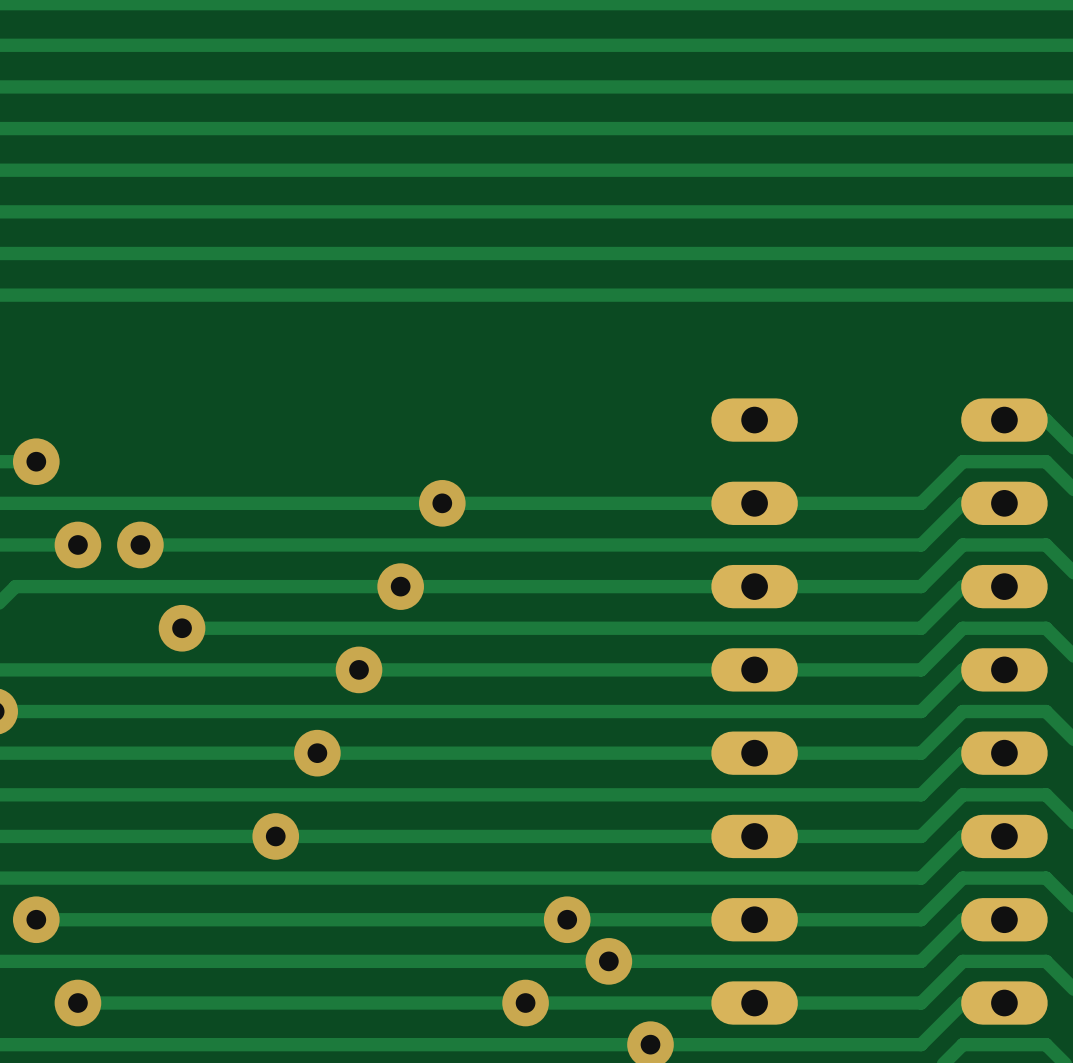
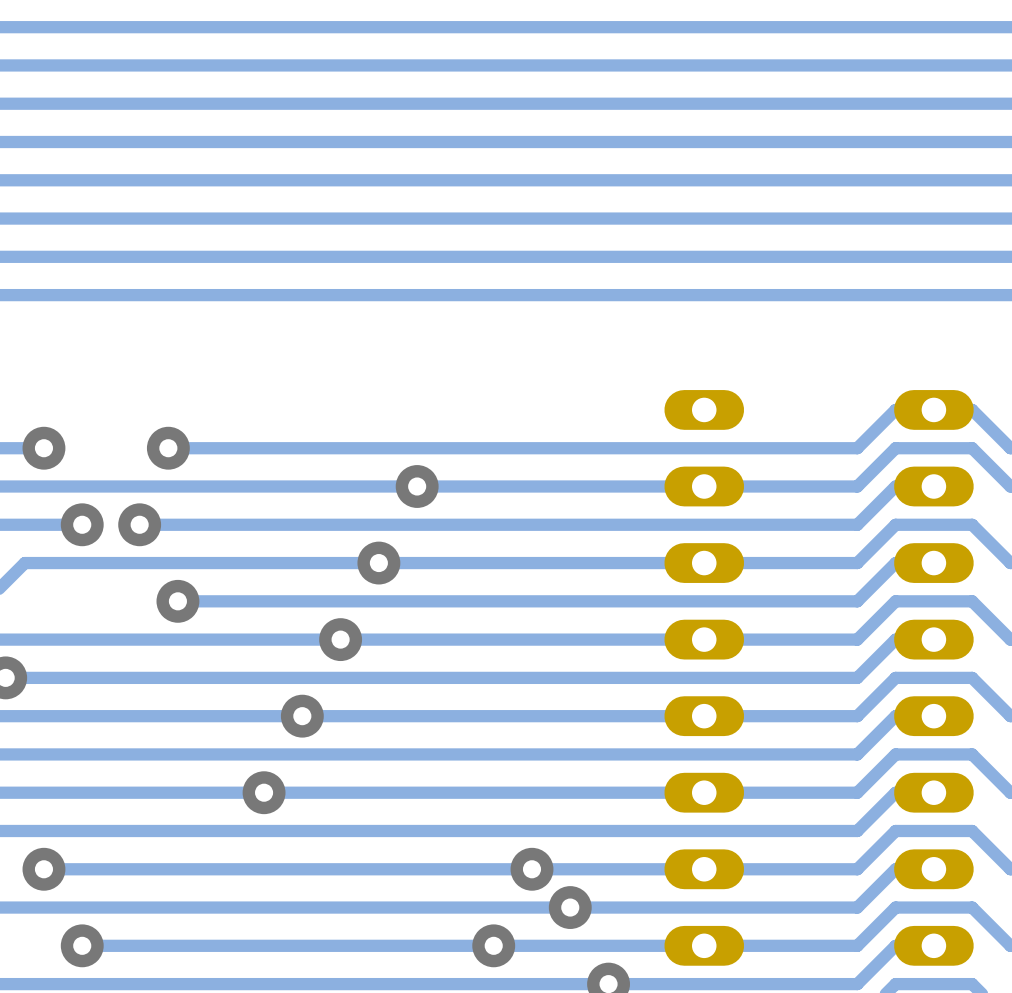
track: none -> (933, 409) (895, 409) (857, 448) (168, 448)
via: none -> (168, 448)

